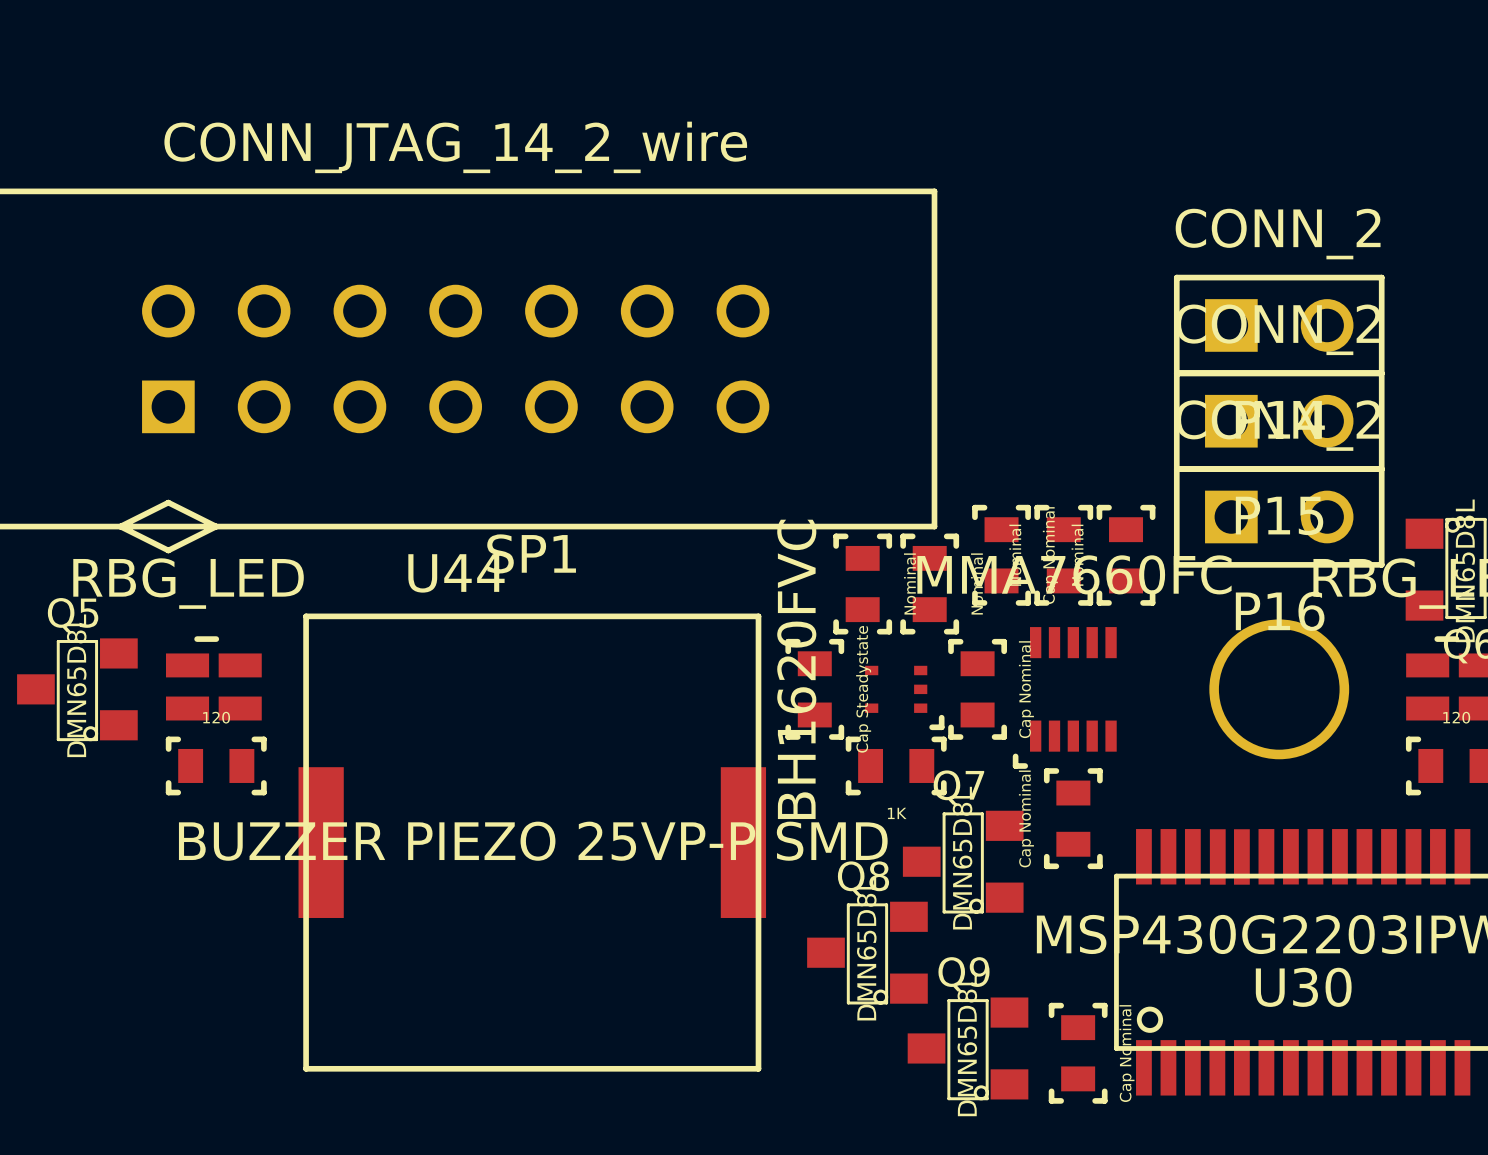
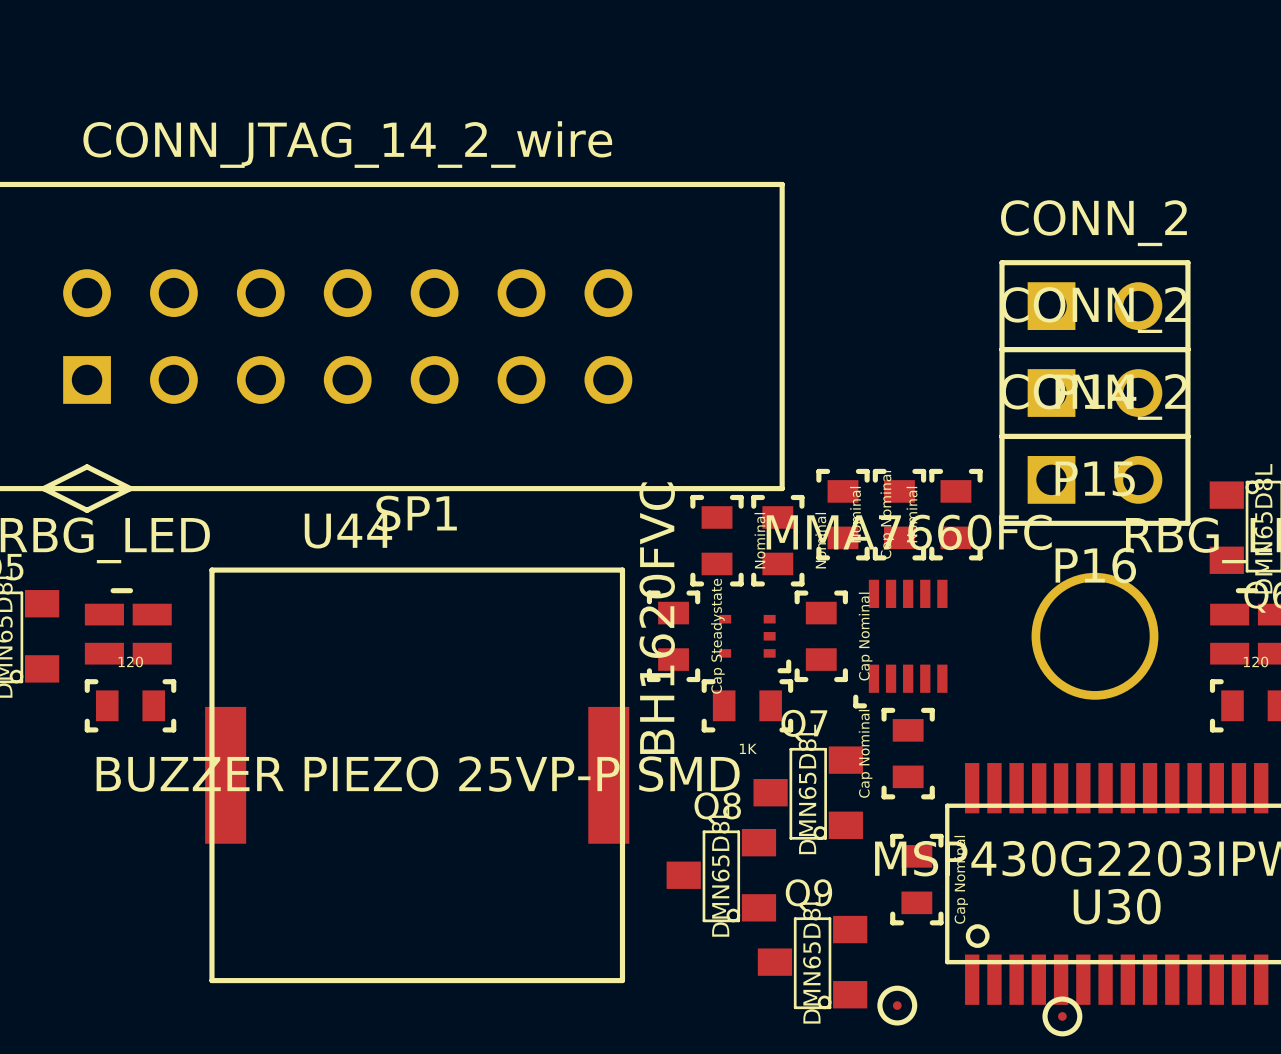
part position: (1078, 1053) -> (916, 879)
part: none -> (897, 1005)
part: none -> (1062, 1016)

